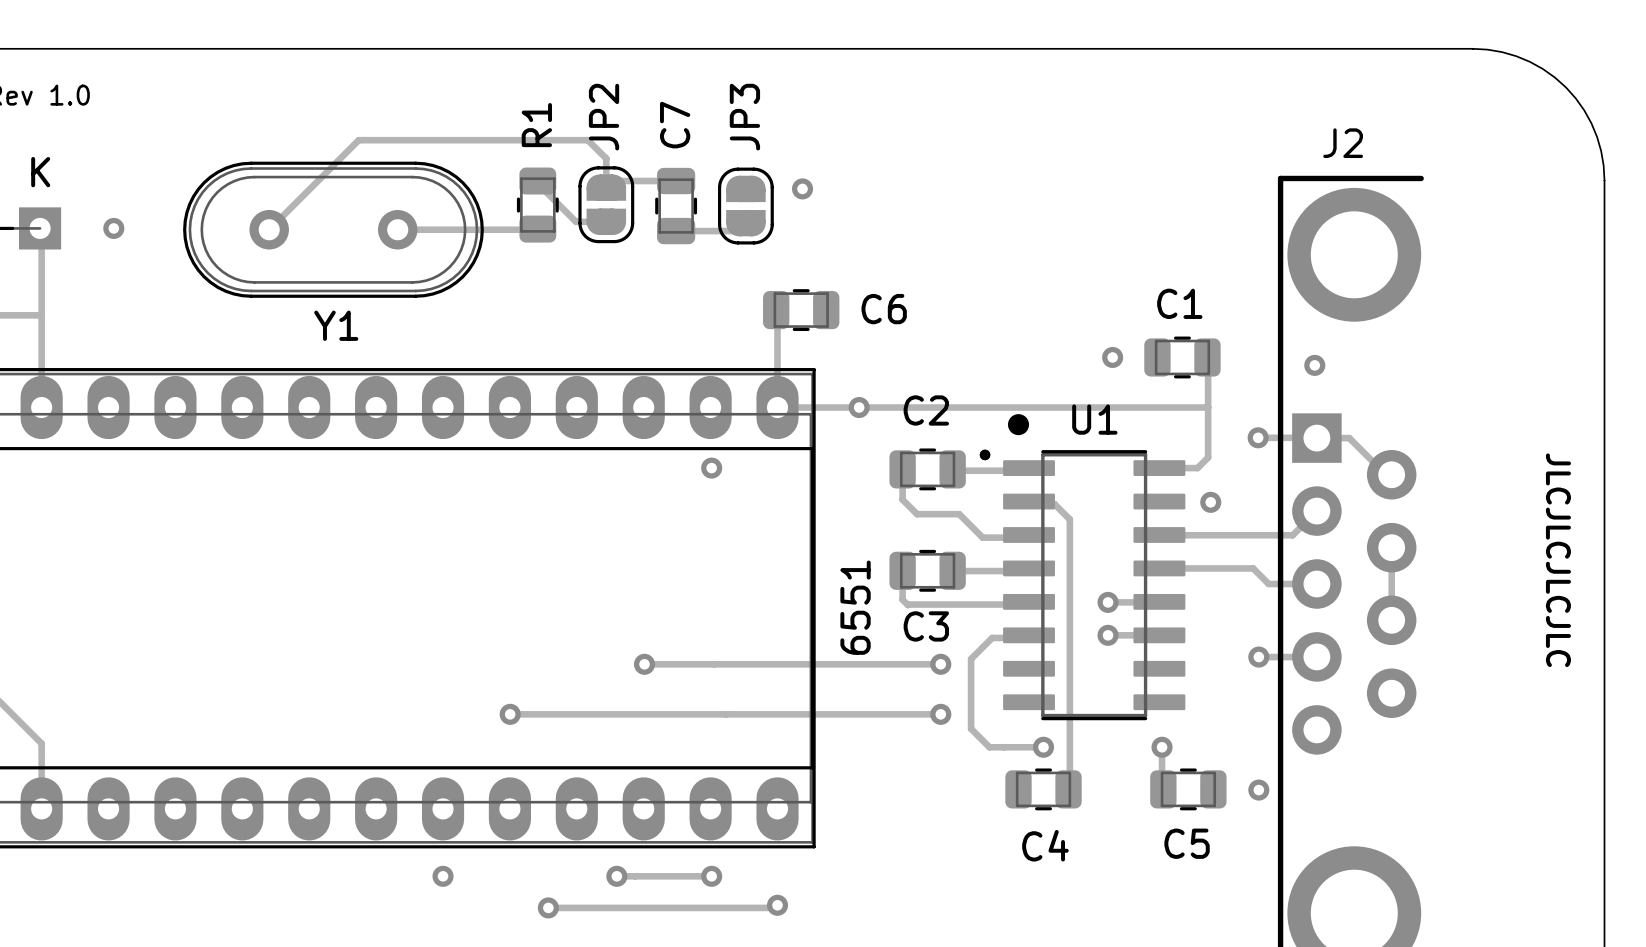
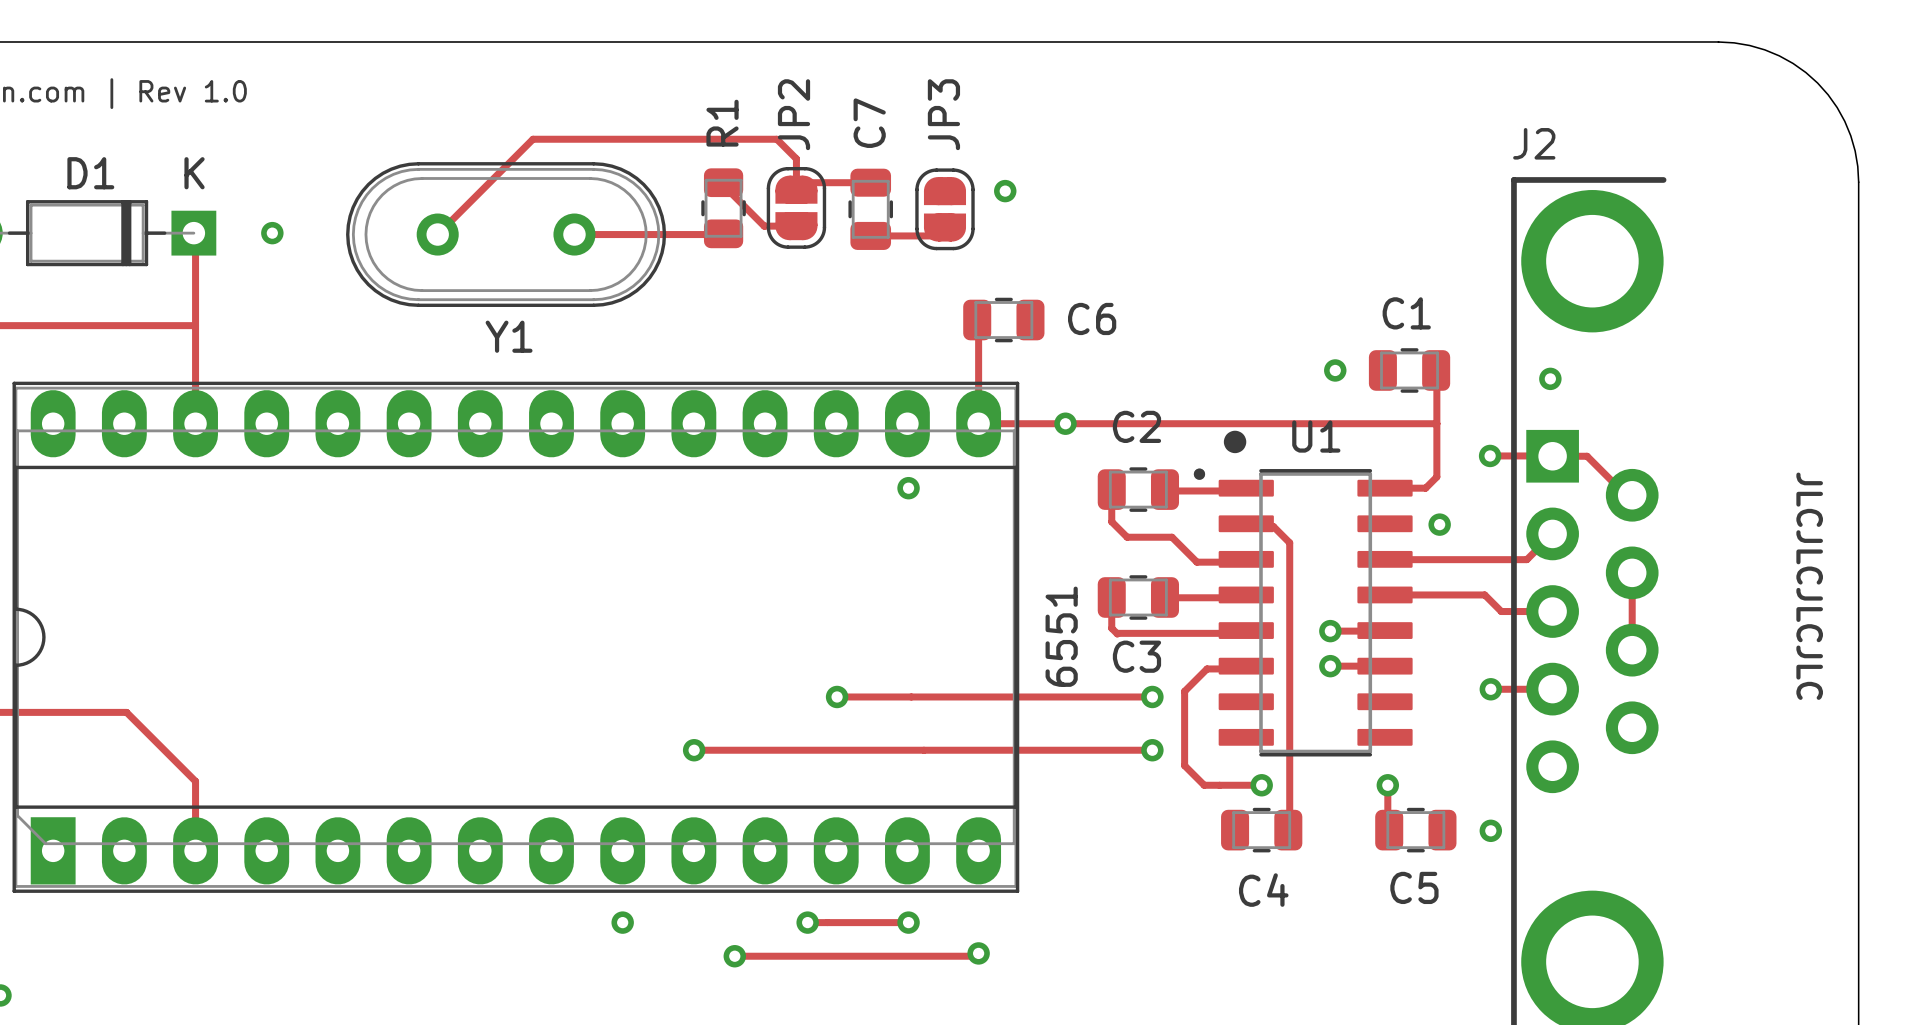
J2 name position: J2 (1343, 143) -> J2 (1534, 143)

